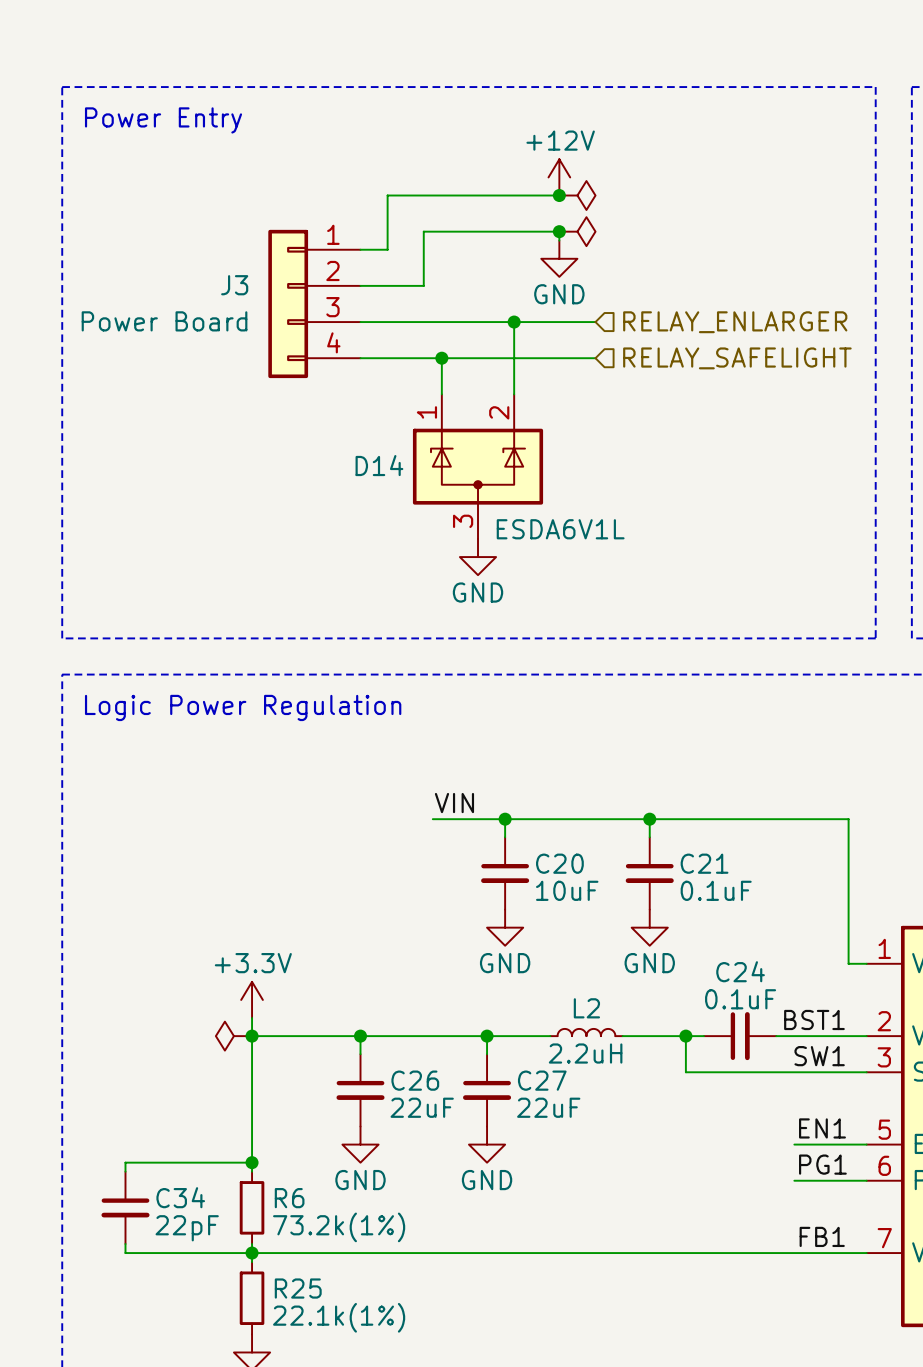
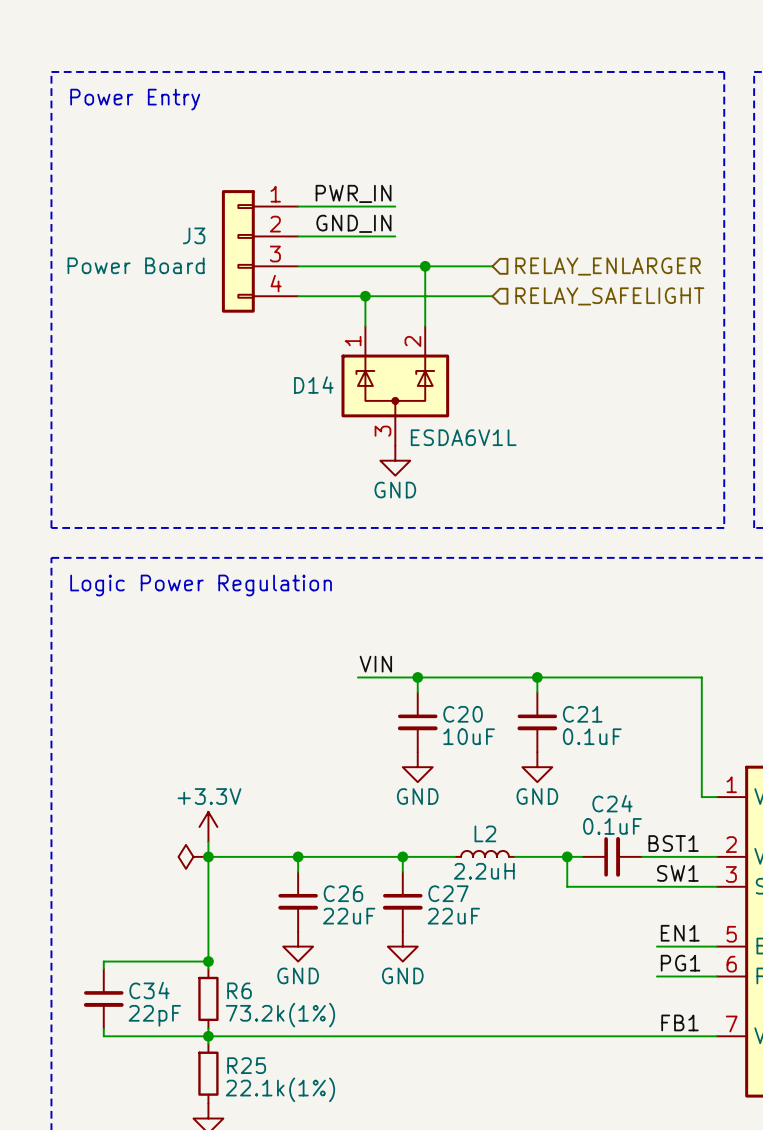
power symbol: +12V (559, 177) -> none
wire: (559, 195) (387, 195) (387, 249) -> (395, 206) (320, 206)
junction: (559, 195) -> none
power symbol: (577, 195) -> none
junction: (559, 231) -> none
power symbol: (577, 231) -> none
label: none -> PWR_IN (353, 193)
wire: (559, 240) (559, 231) (423, 231) (423, 285) -> (395, 236) (350, 236)
power symbol: GND (559, 258) -> none
label: none -> GND_IN (353, 223)

